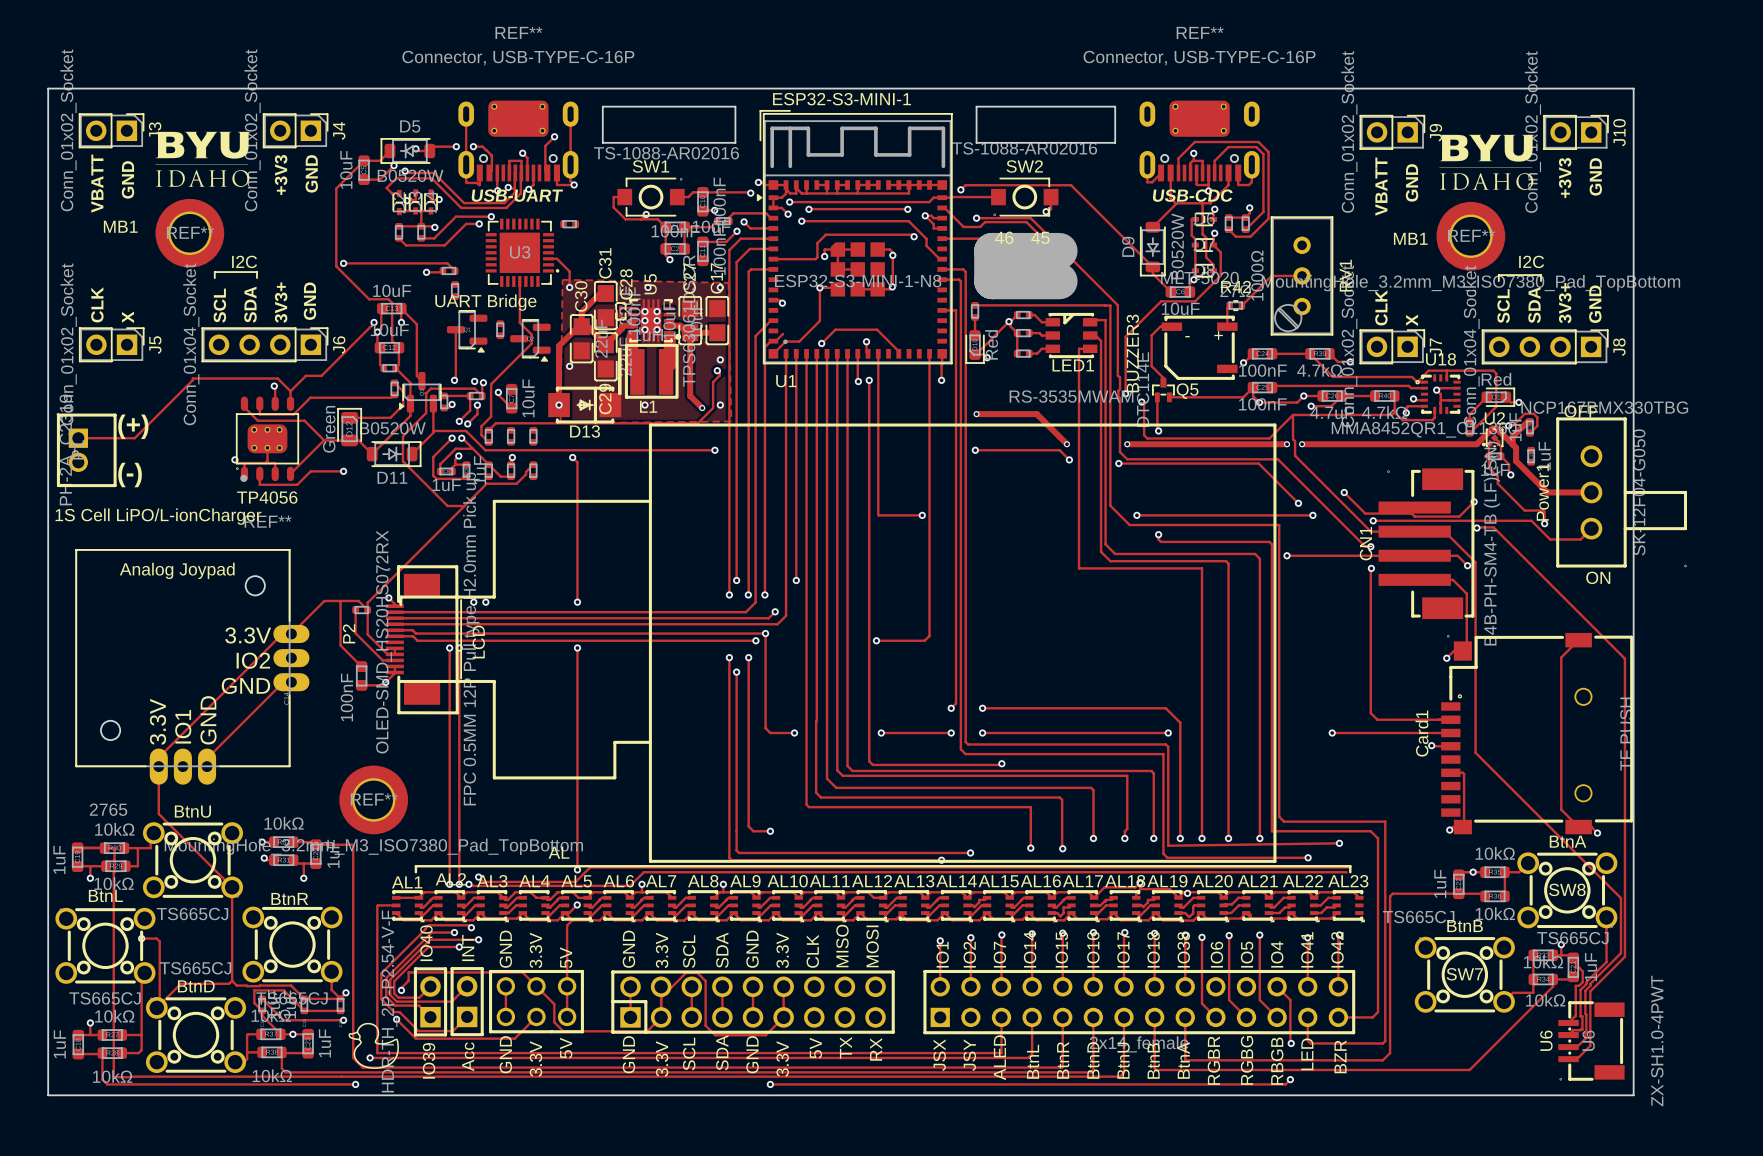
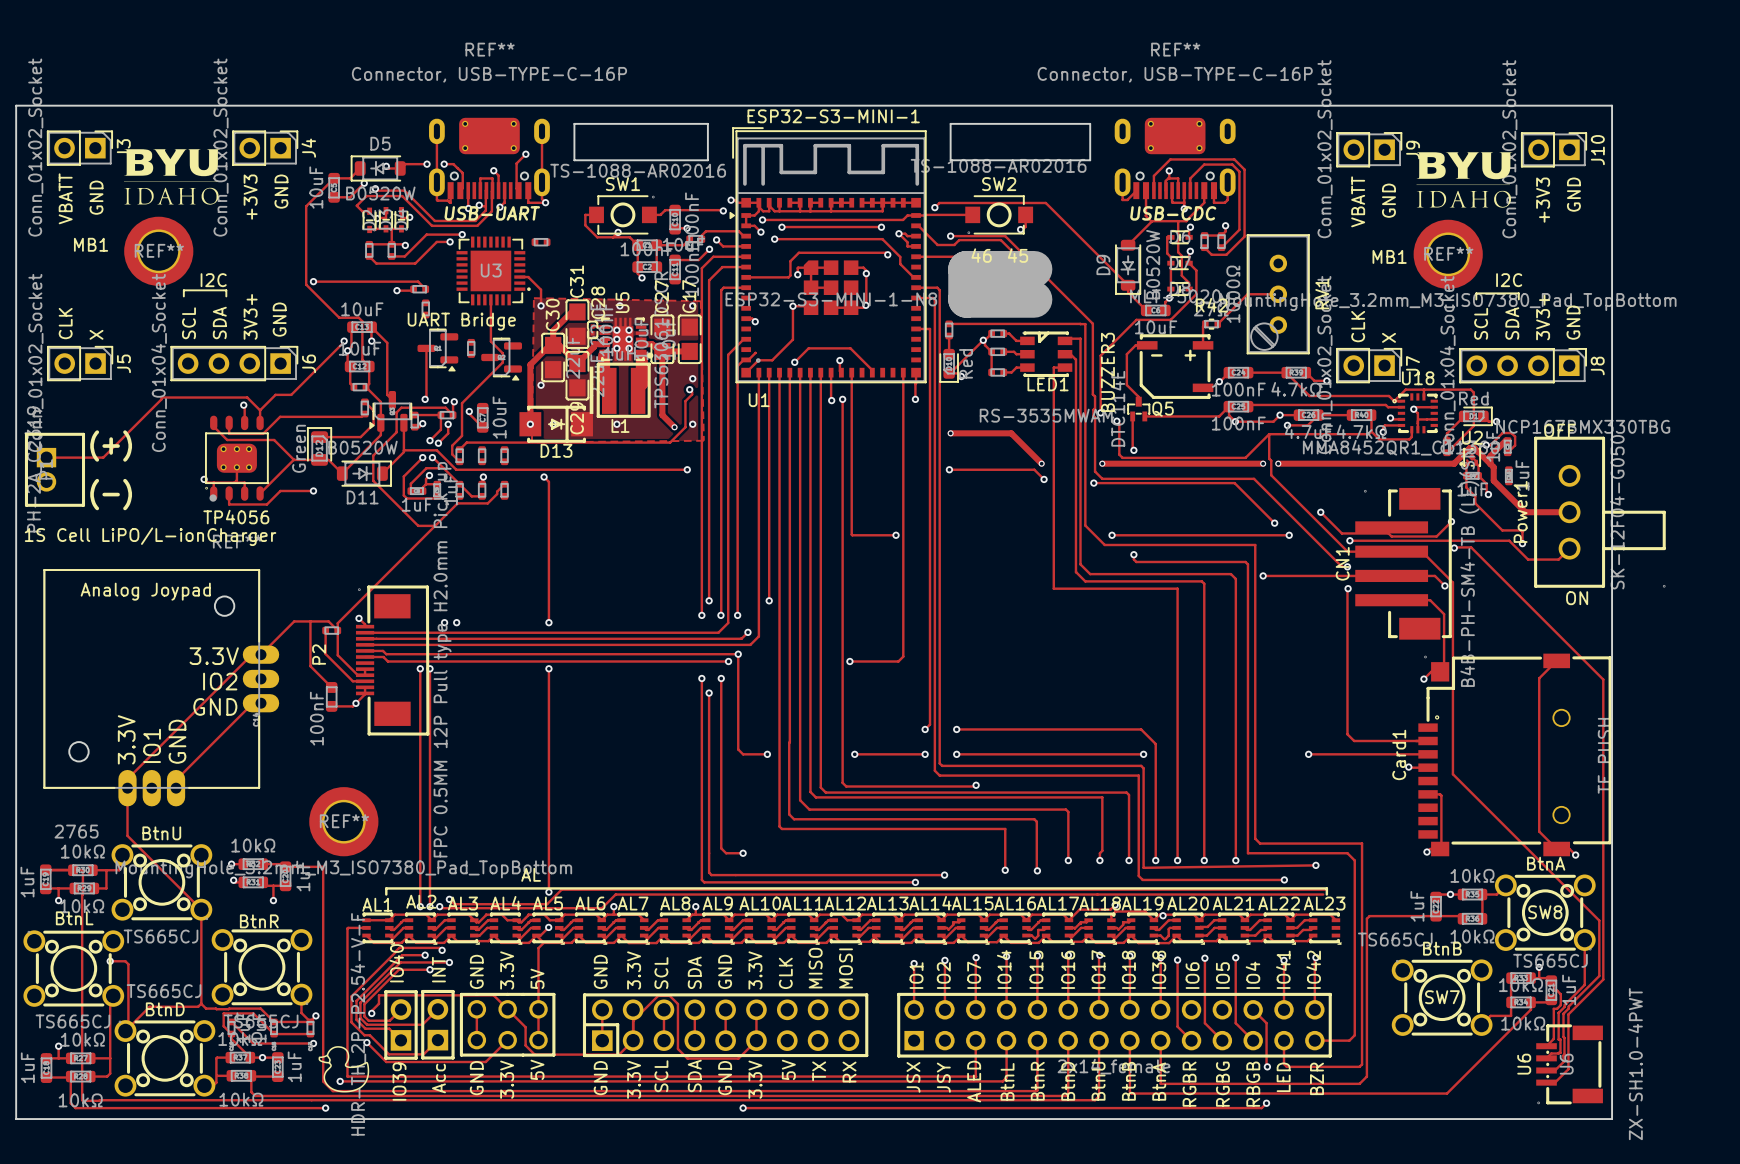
LCD: OLED-SMD_HS20HS072RX (837, 643) -> none

